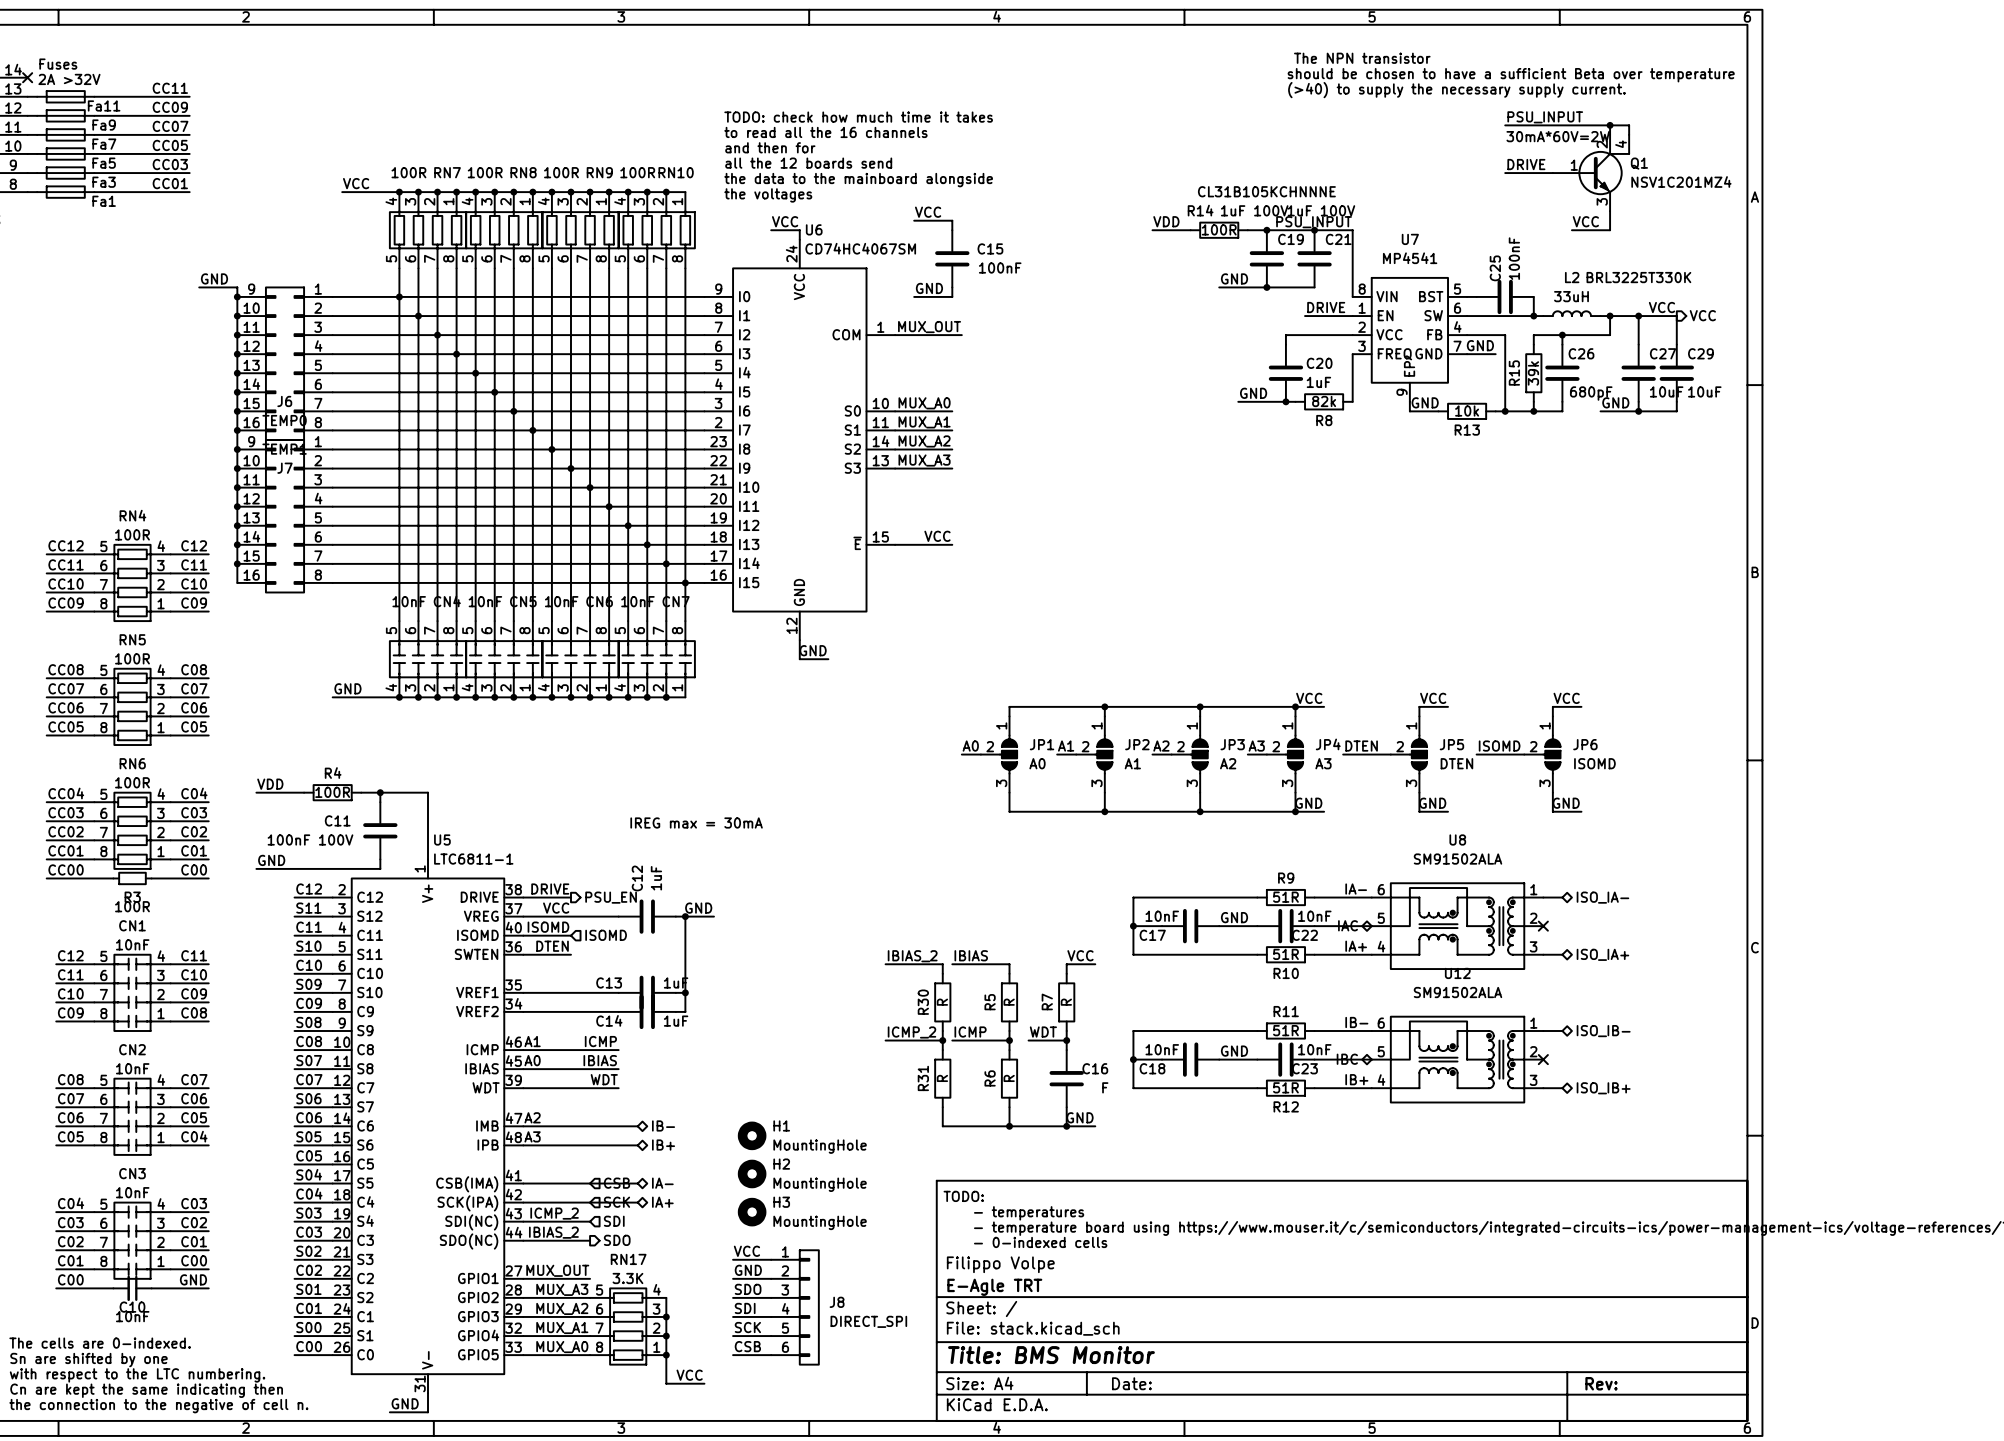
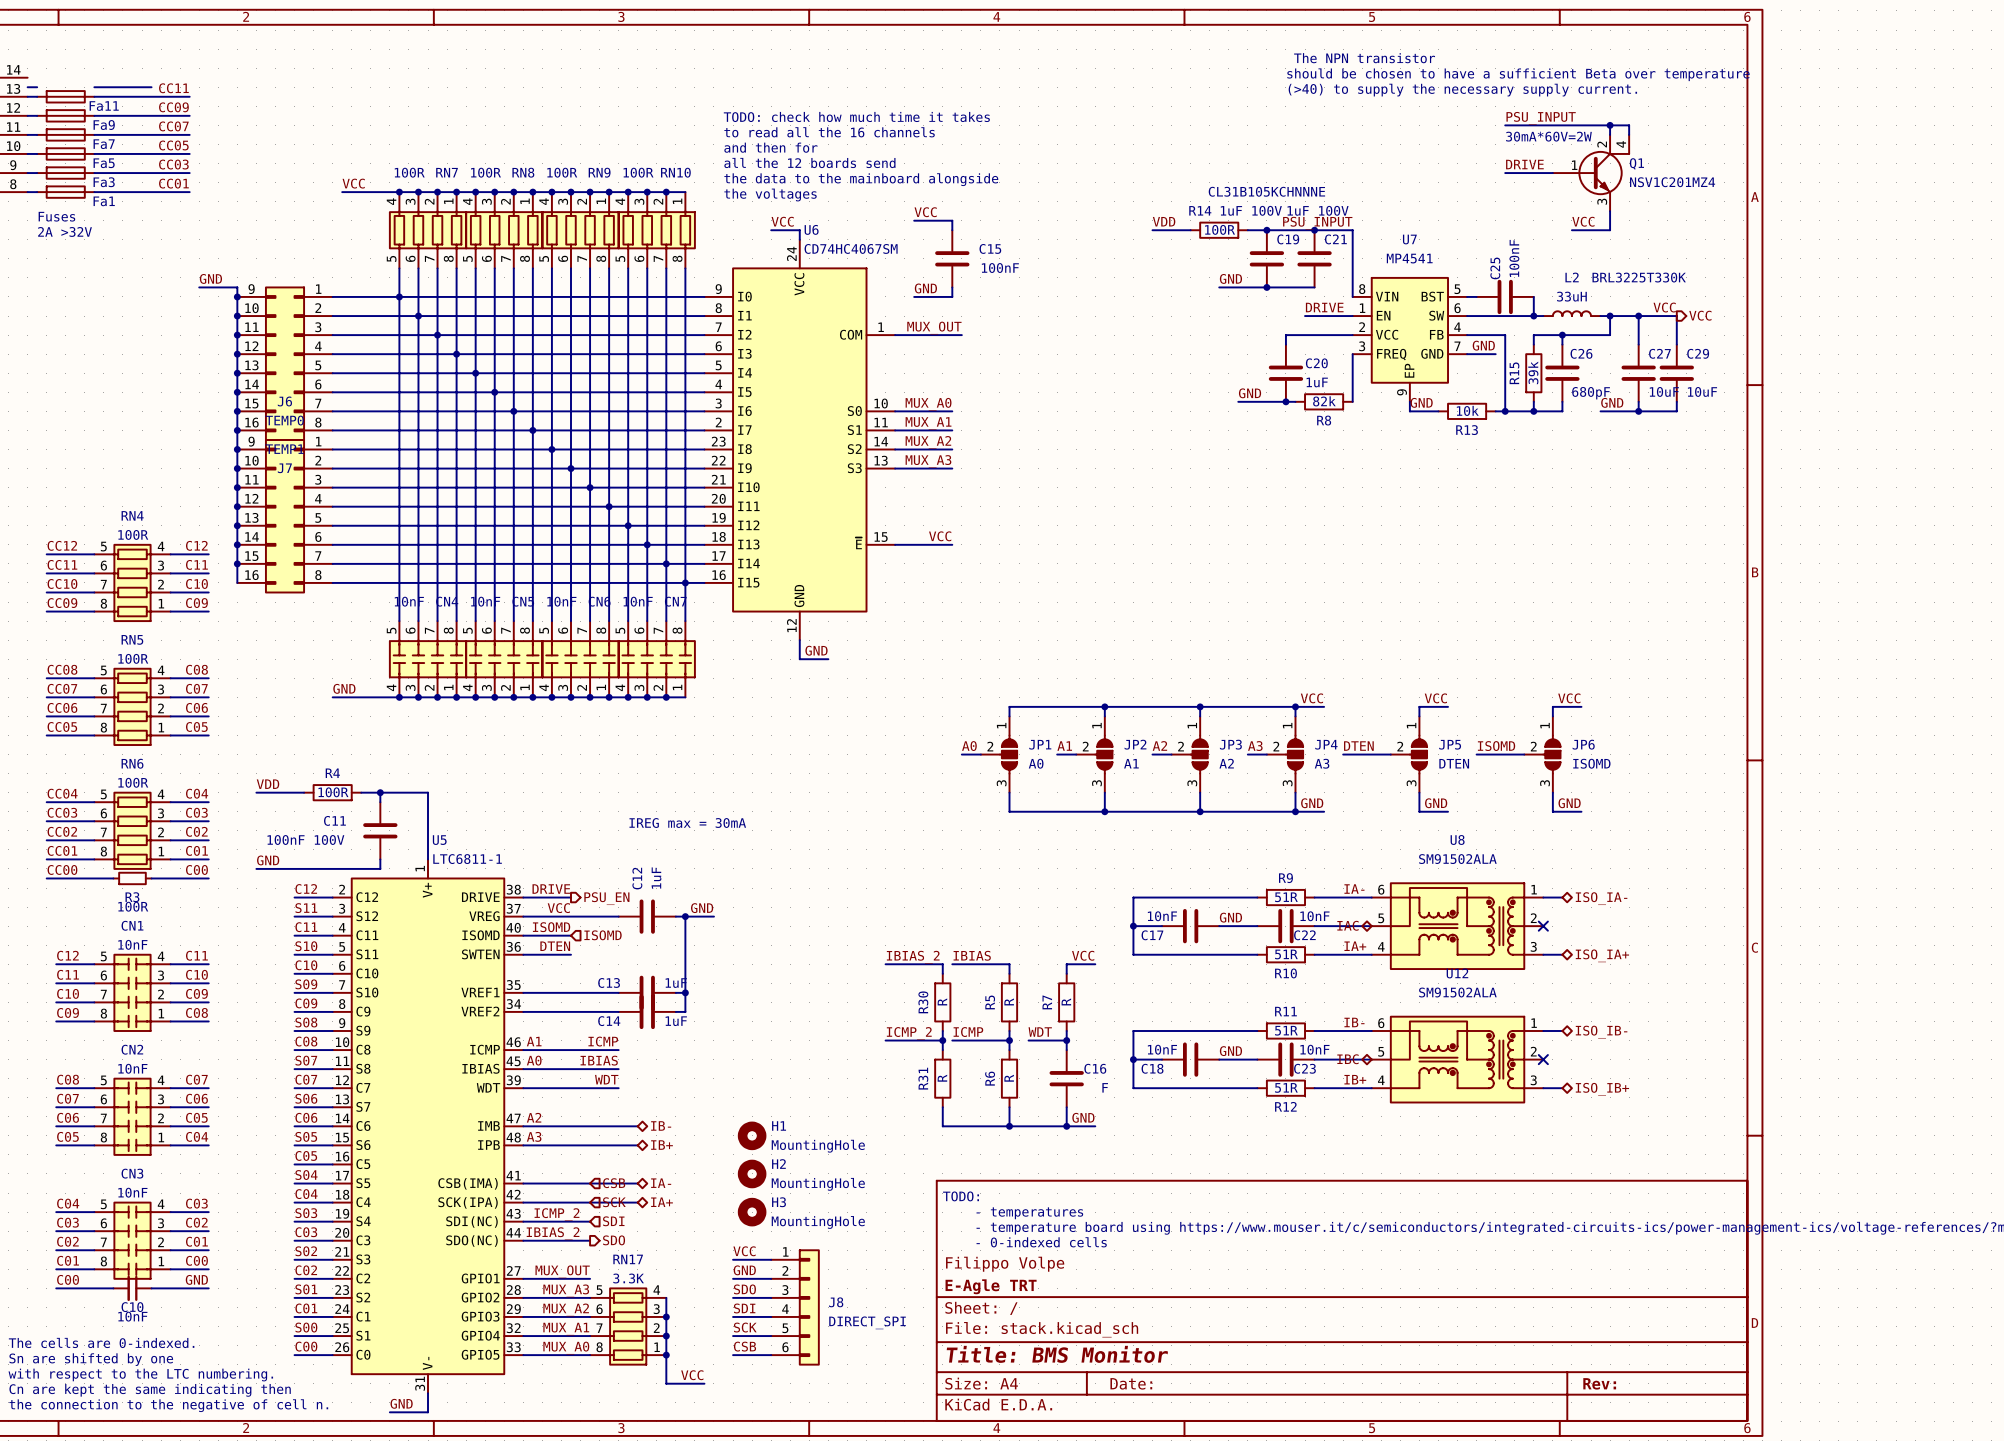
text position: Fuses (58, 64) -> Fuses (56, 216)
no-connect mark: (27, 77) -> none
text position: 2A >32V (69, 79) -> 2A >32V (65, 231)
wire: none -> (27, 87) (37, 87)
wire: none -> (94, 87) (151, 87)

